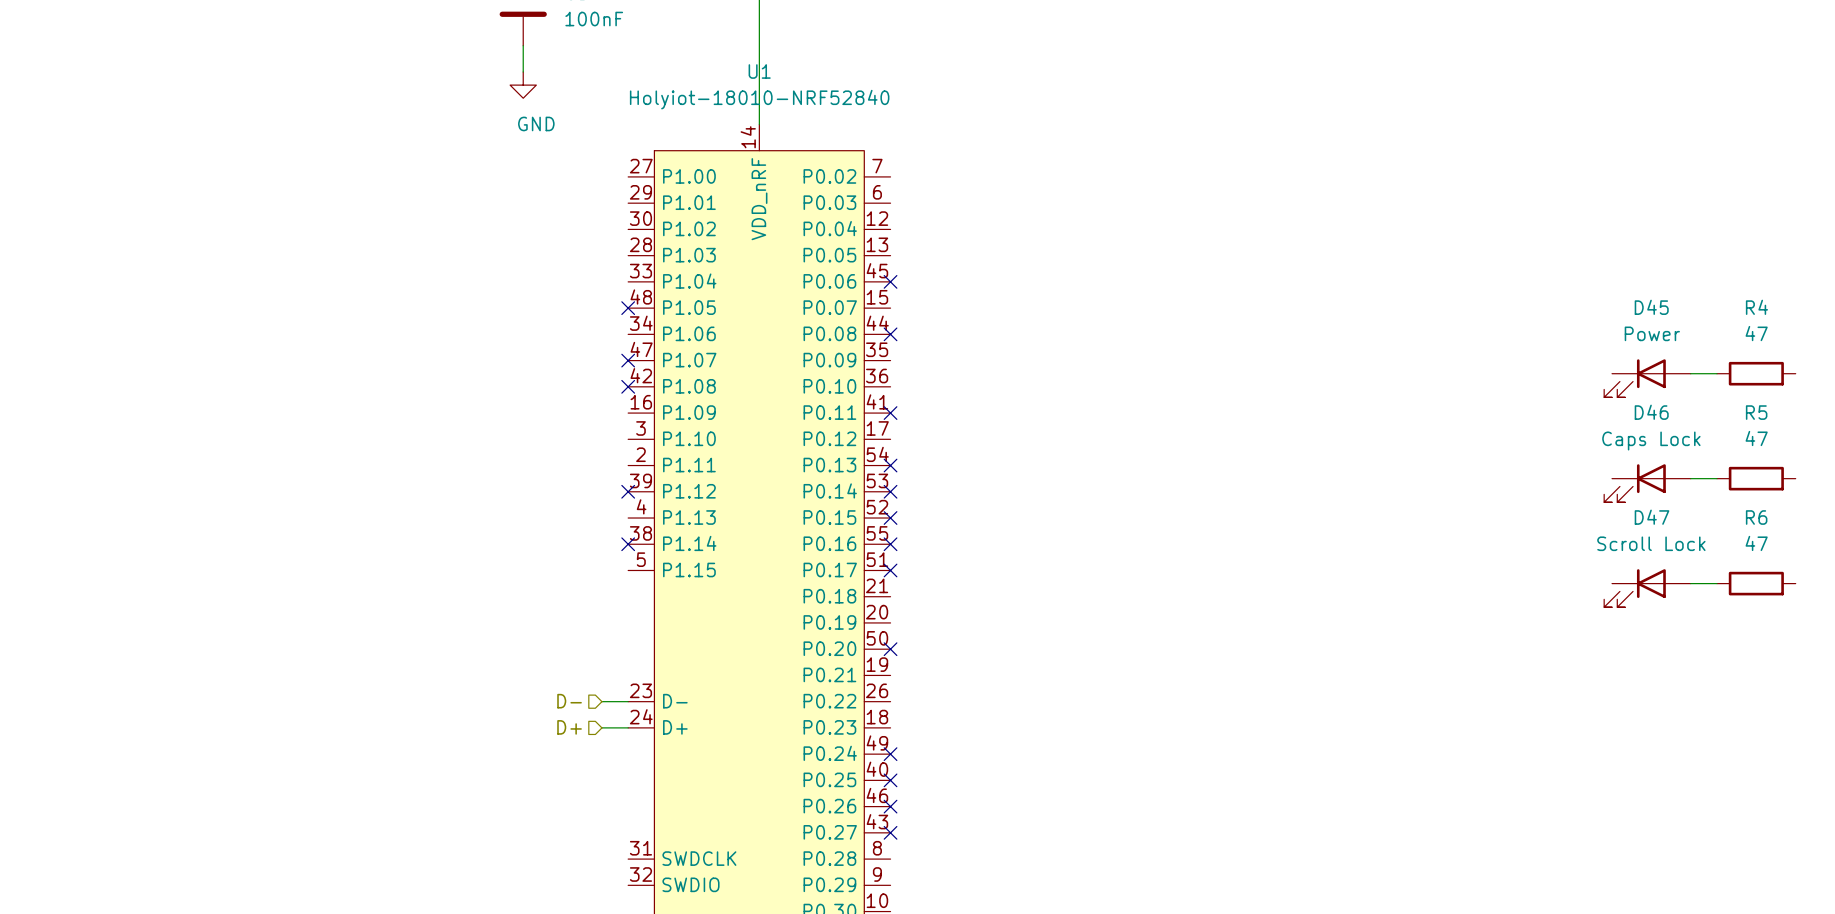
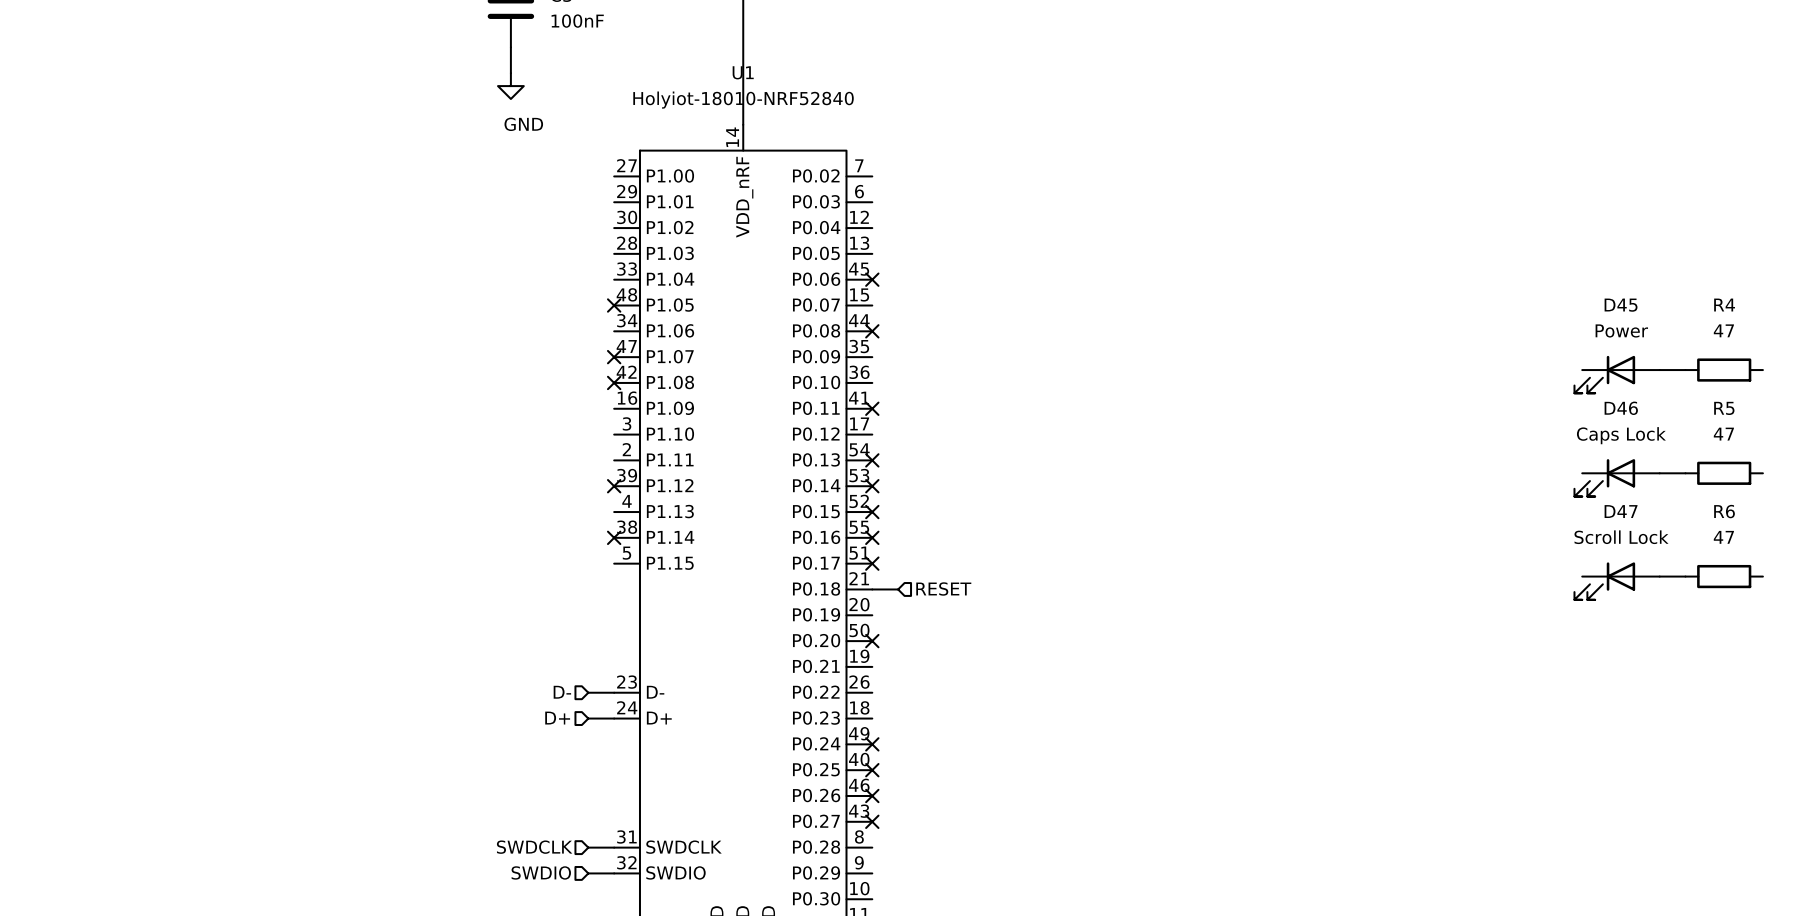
wire: none -> (872, 589) (898, 589)
hierarchical label: none -> RESET (943, 589)
hierarchical label: none -> SWDCLK (534, 847)
wire: none -> (588, 847) (614, 847)
hierarchical label: none -> SWDIO (541, 872)
wire: none -> (588, 873) (614, 873)

